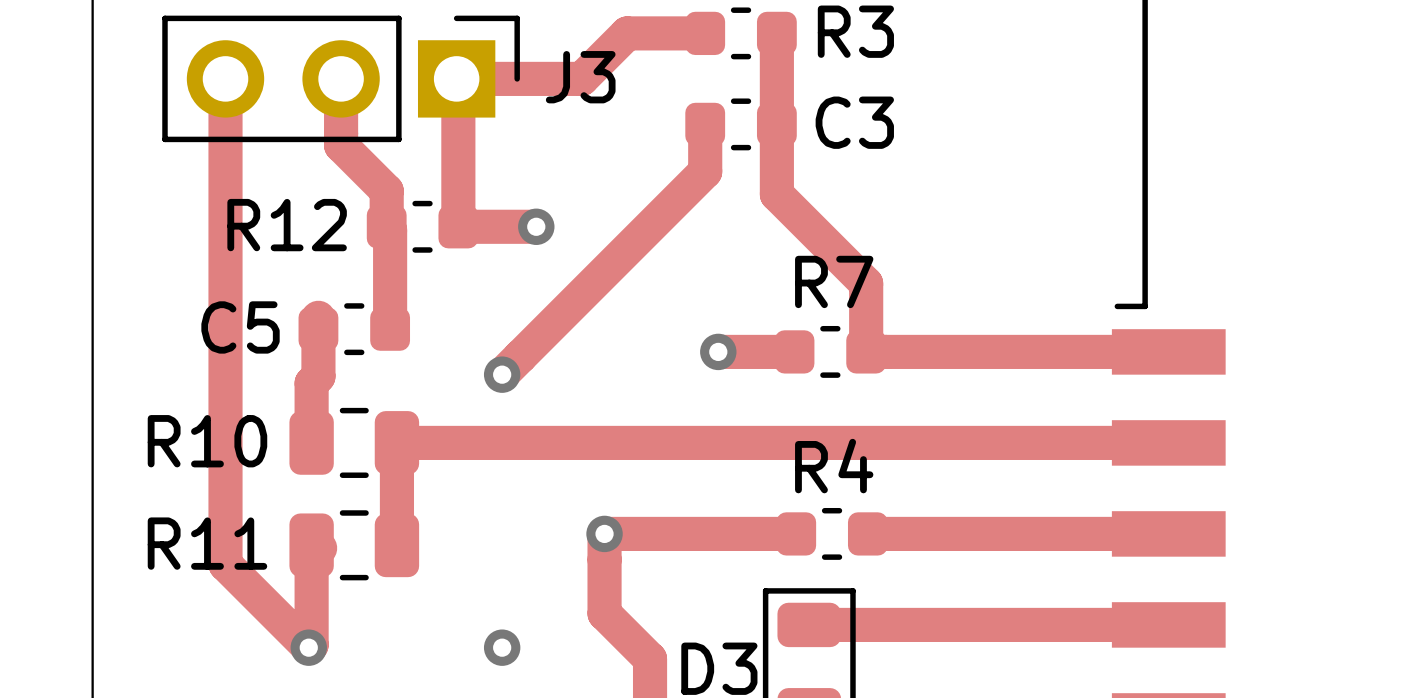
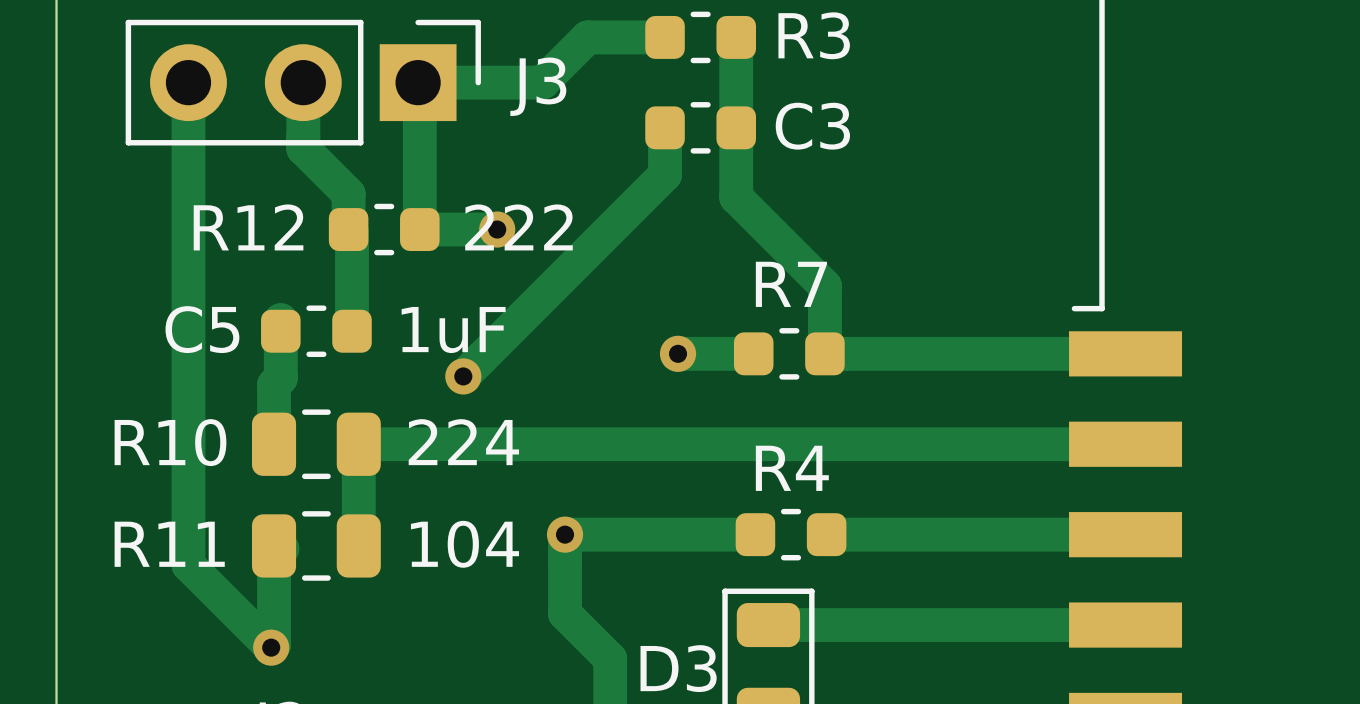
text: none -> 222 (518, 227)
text: none -> 1uF (453, 329)
text: none -> 224 (463, 442)
text: none -> 104 (464, 544)
via: (502, 647) -> none

